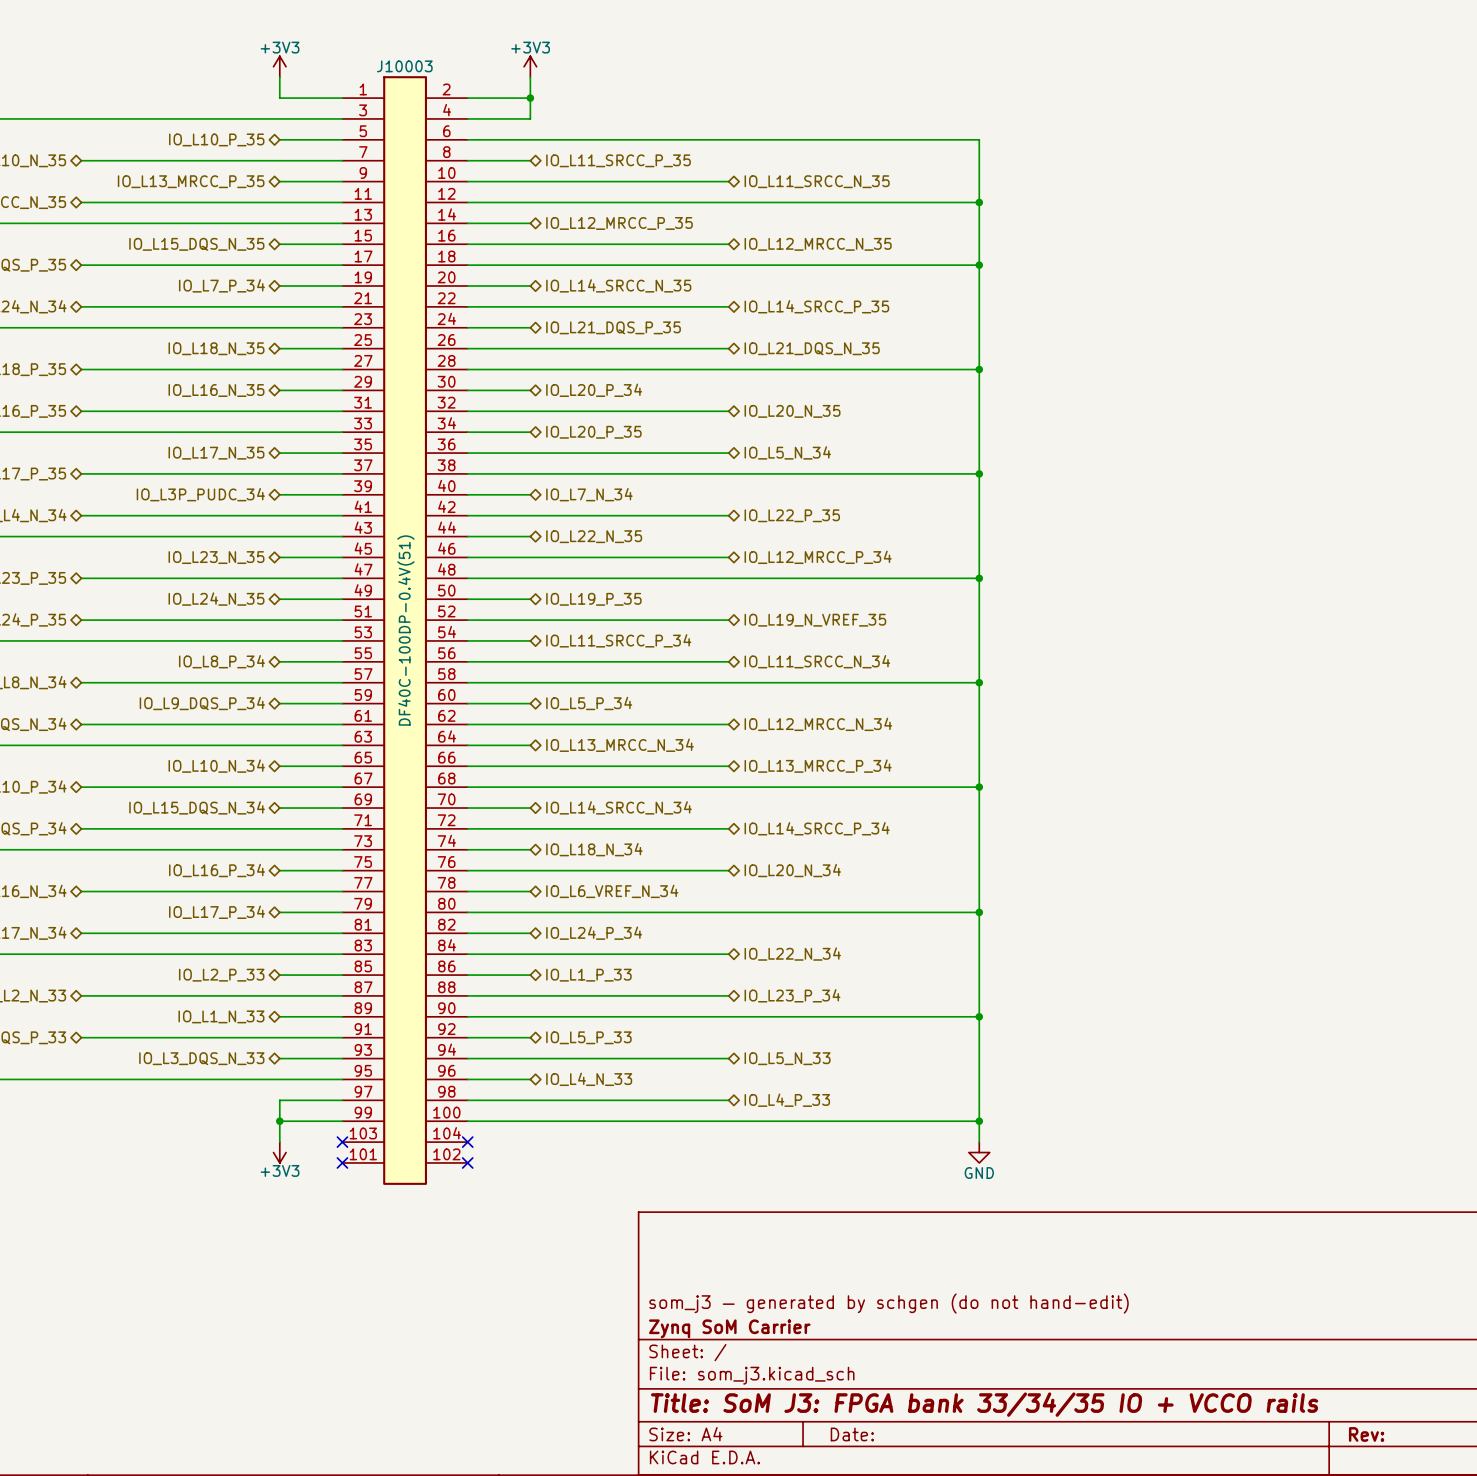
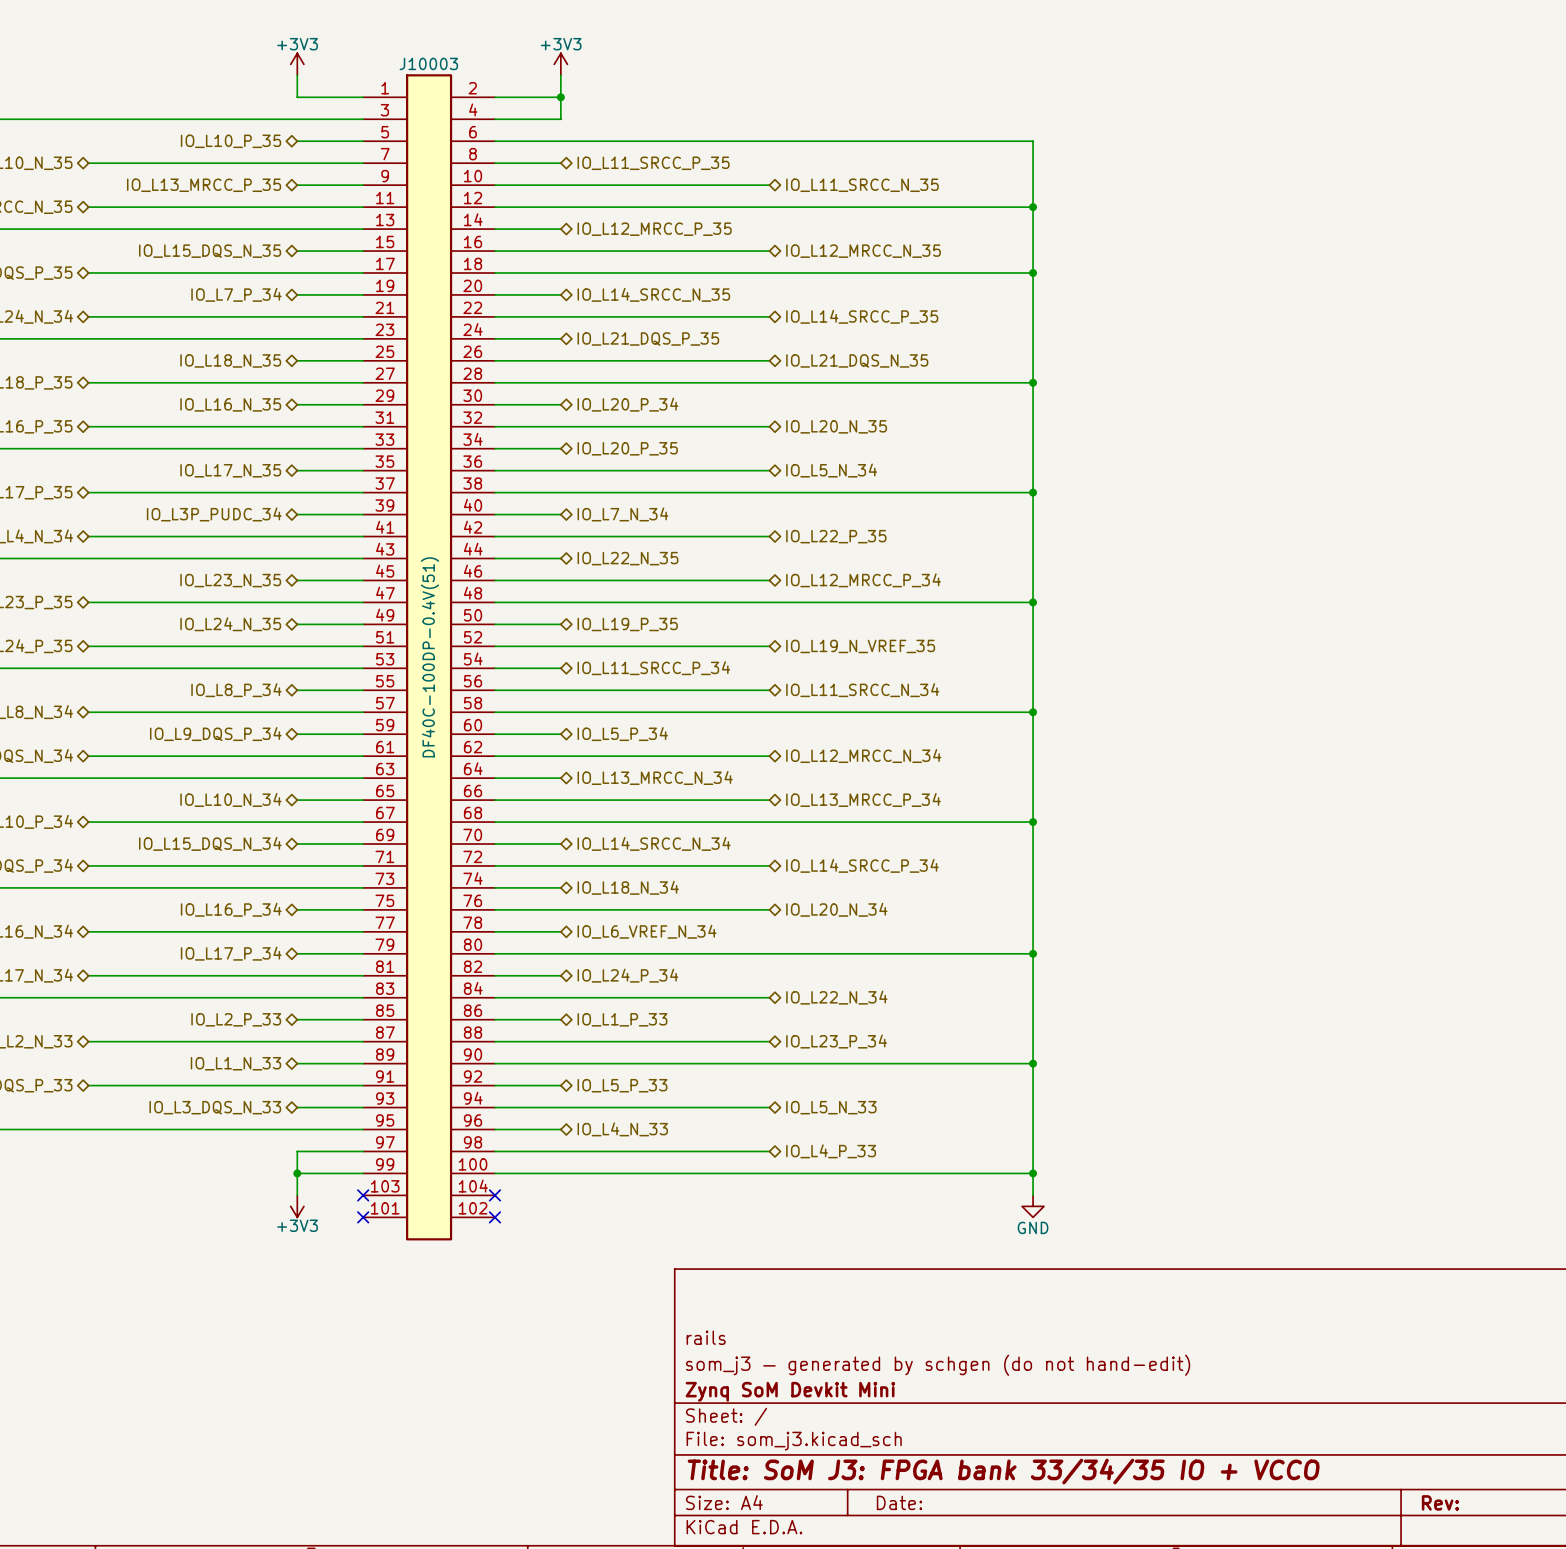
title block: none -> rails (706, 1337)
title block: Zynq SoM Carrier (729, 1328) -> Zynq SoM Devkit Mini (790, 1391)
title block: Title: SoM J3: FPGA bank 33/34/35 IO + VCCO rails (984, 1404) -> Title: SoM J3: FPGA bank 33/34/35 IO + VCCO (1003, 1471)

